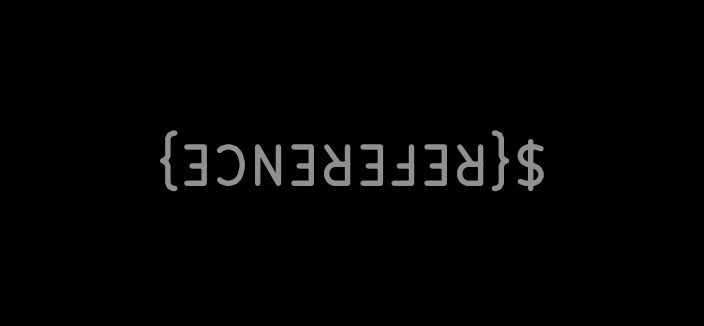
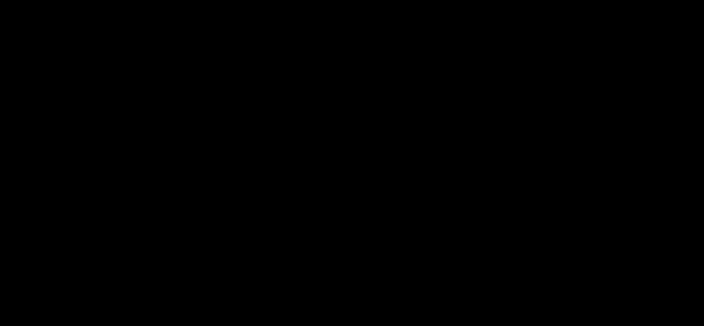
text: ${REFERENCE} (351, 160) -> none

